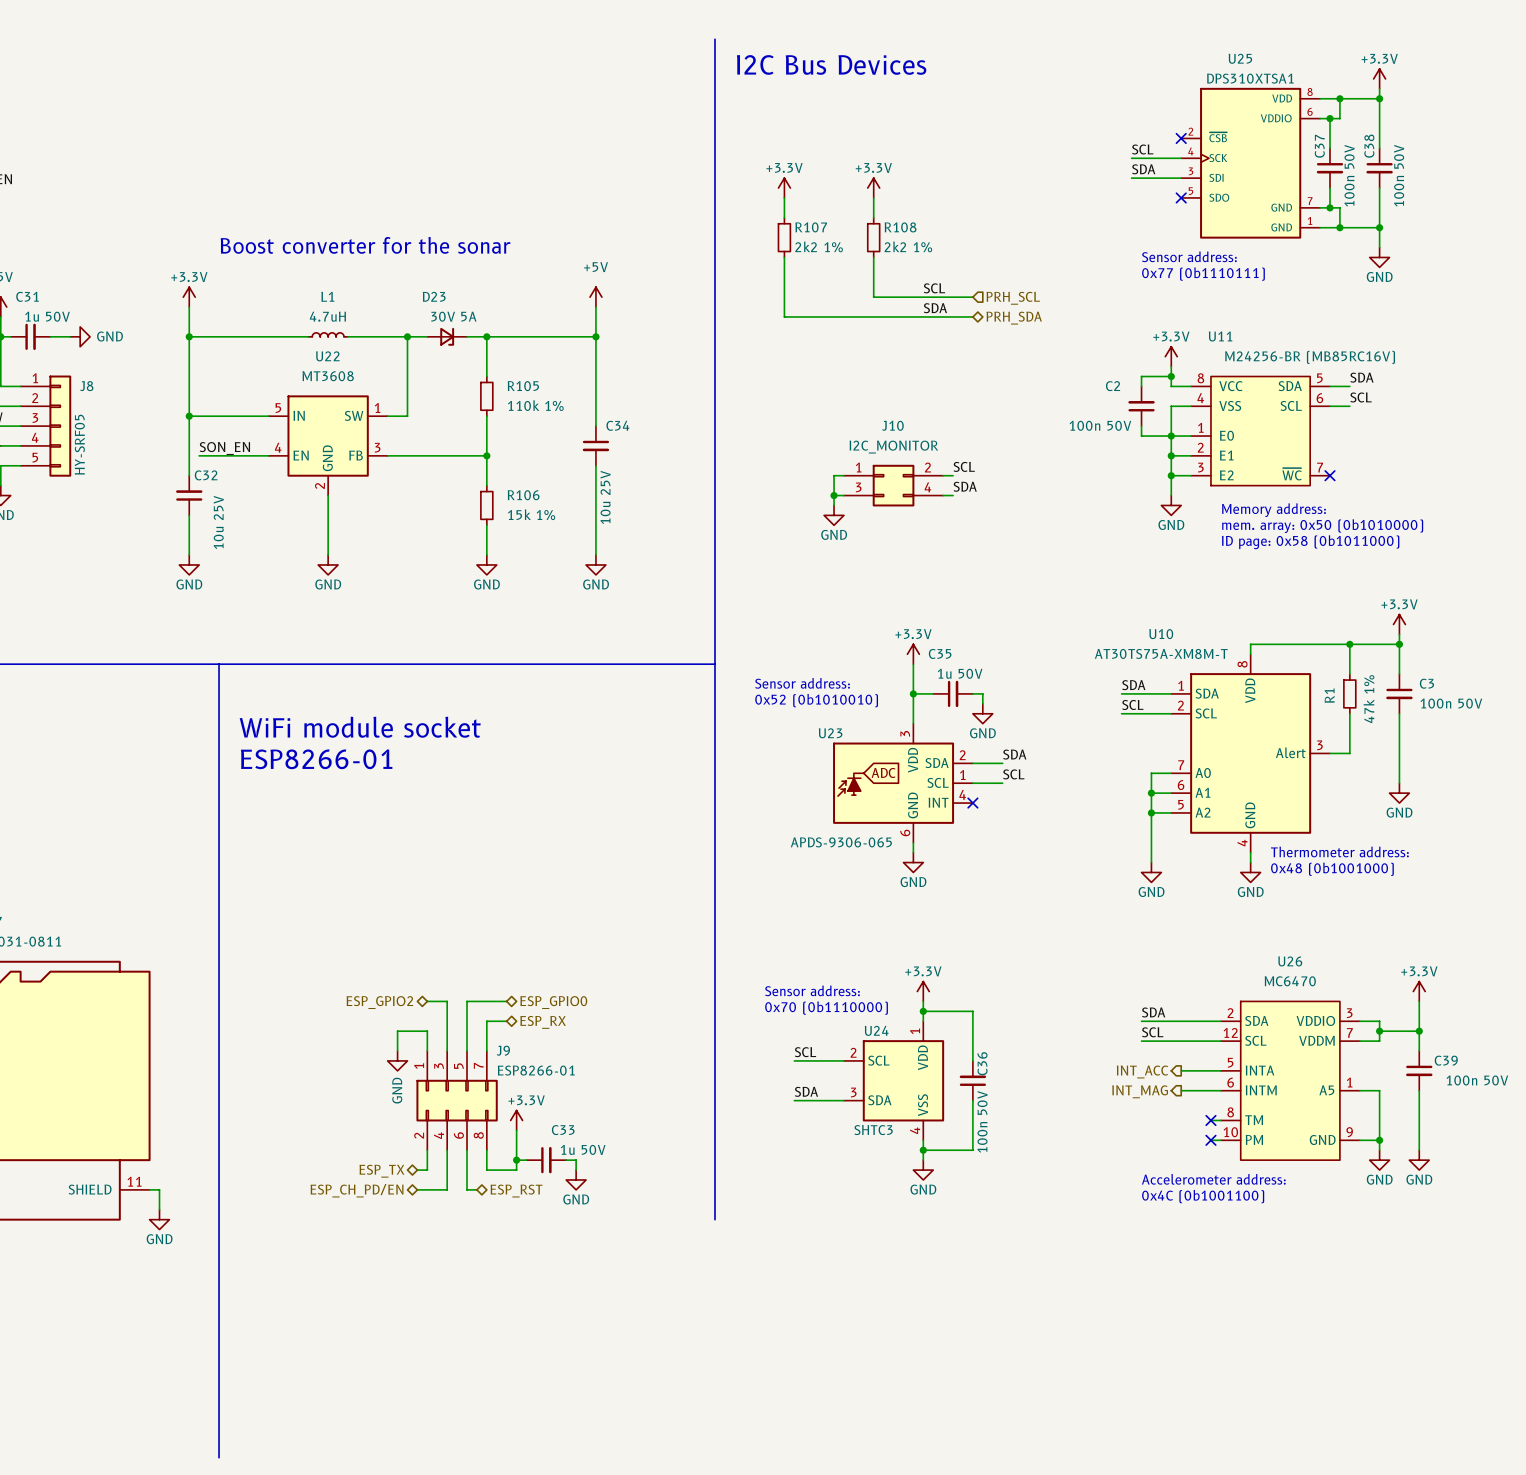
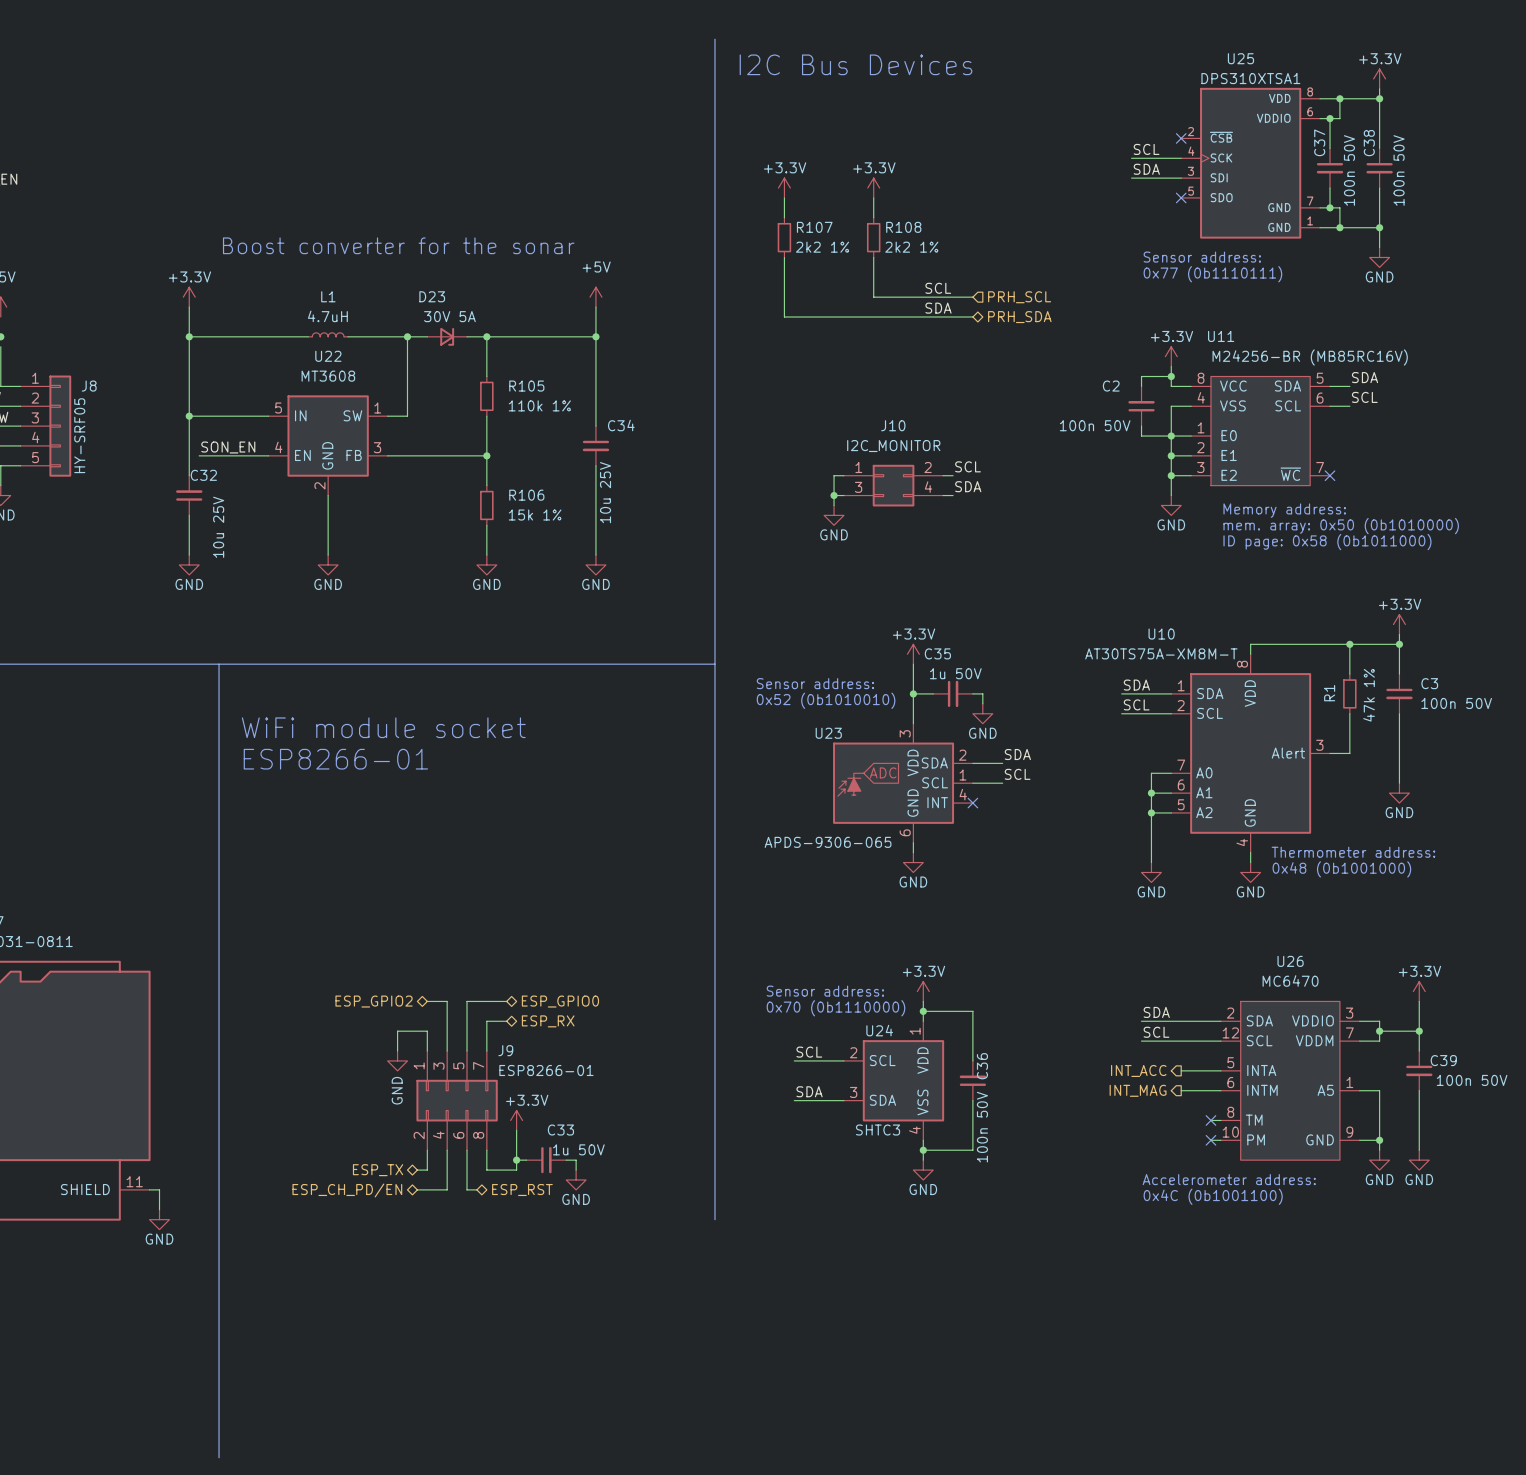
wire: (0, 316) (0, 346) -> none
wire: (0, 336) (10, 336) -> none
C31: 1u 50V (30, 336) -> none
wire: (50, 336) (70, 336) -> none
power symbol: GND (80, 336) -> none

